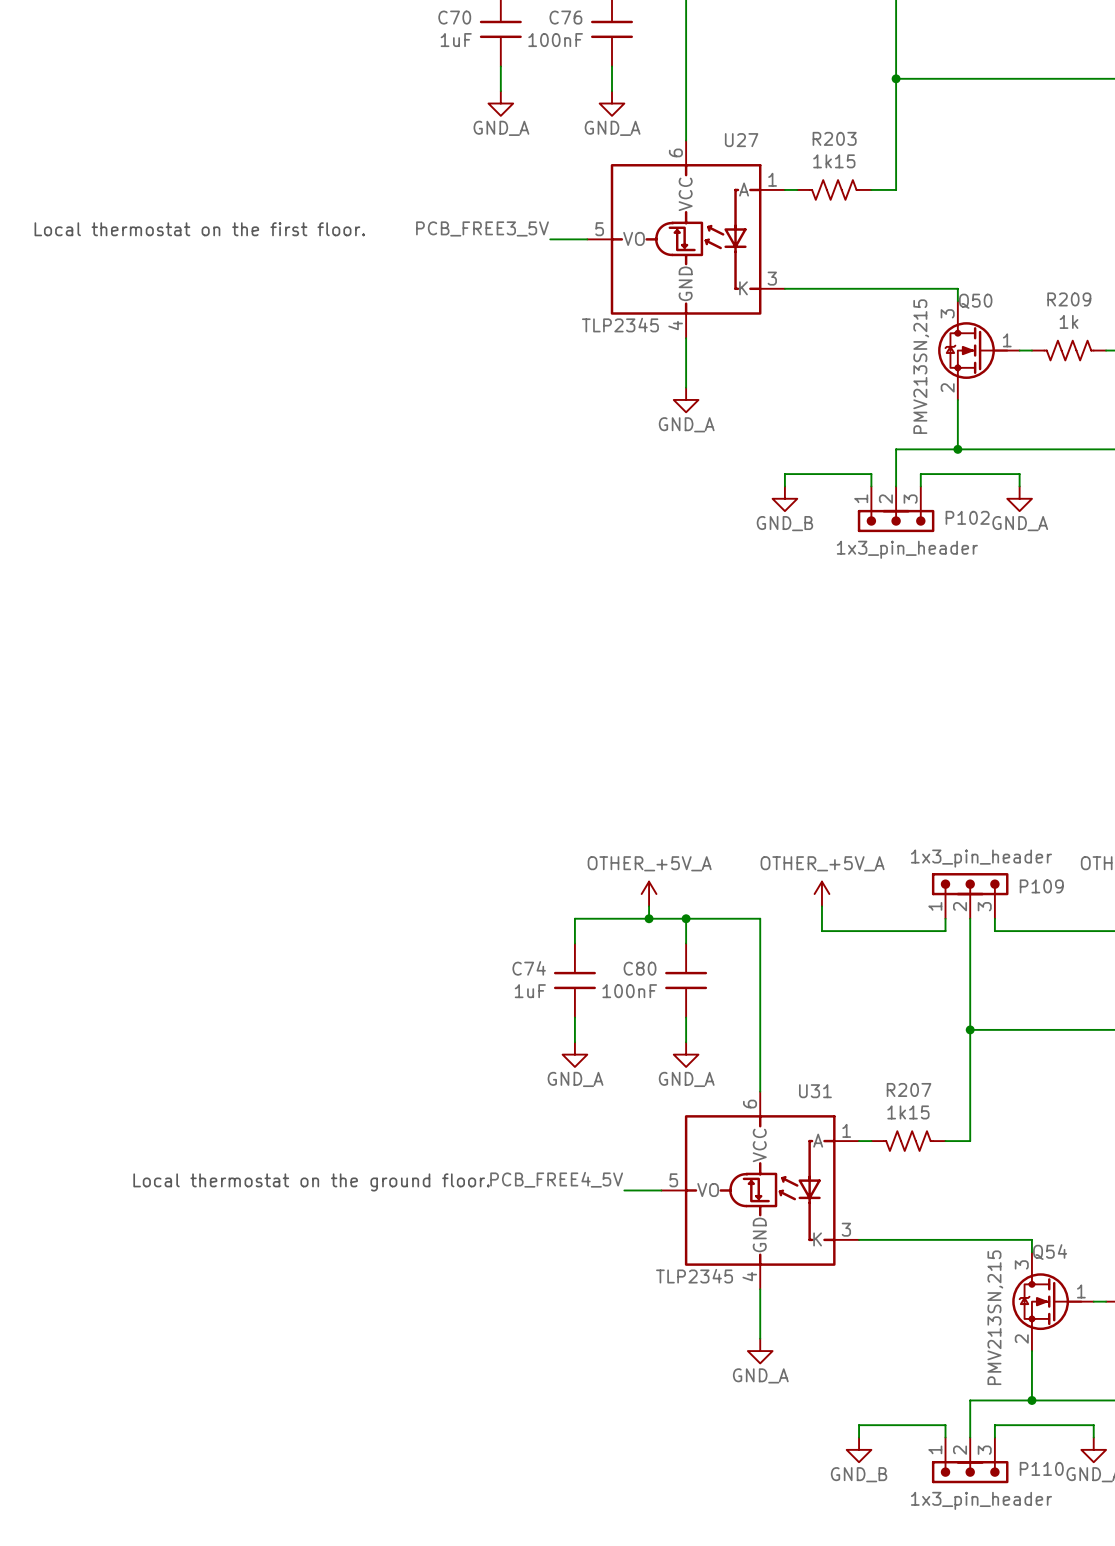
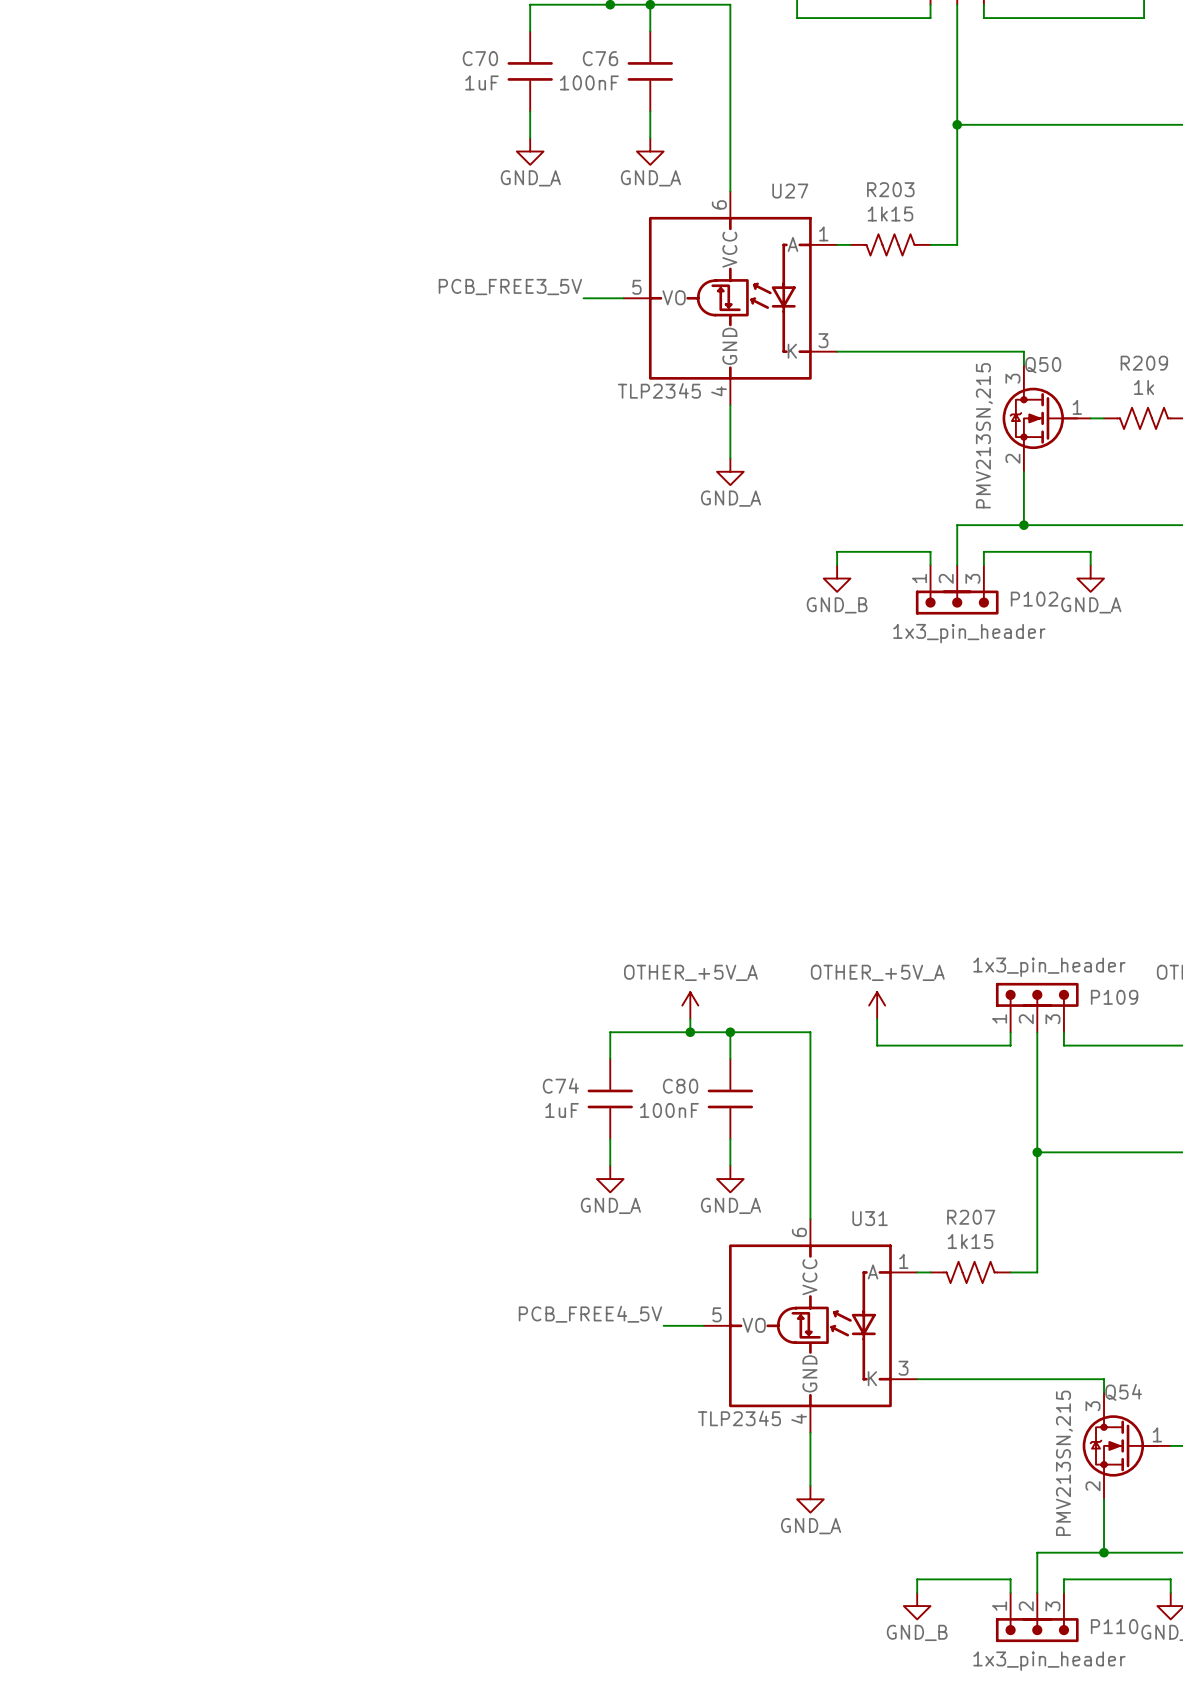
text: Local thermostat on the first floor. (199, 229) -> none
text: Local thermostat on the ground floor. (311, 1182) -> none

